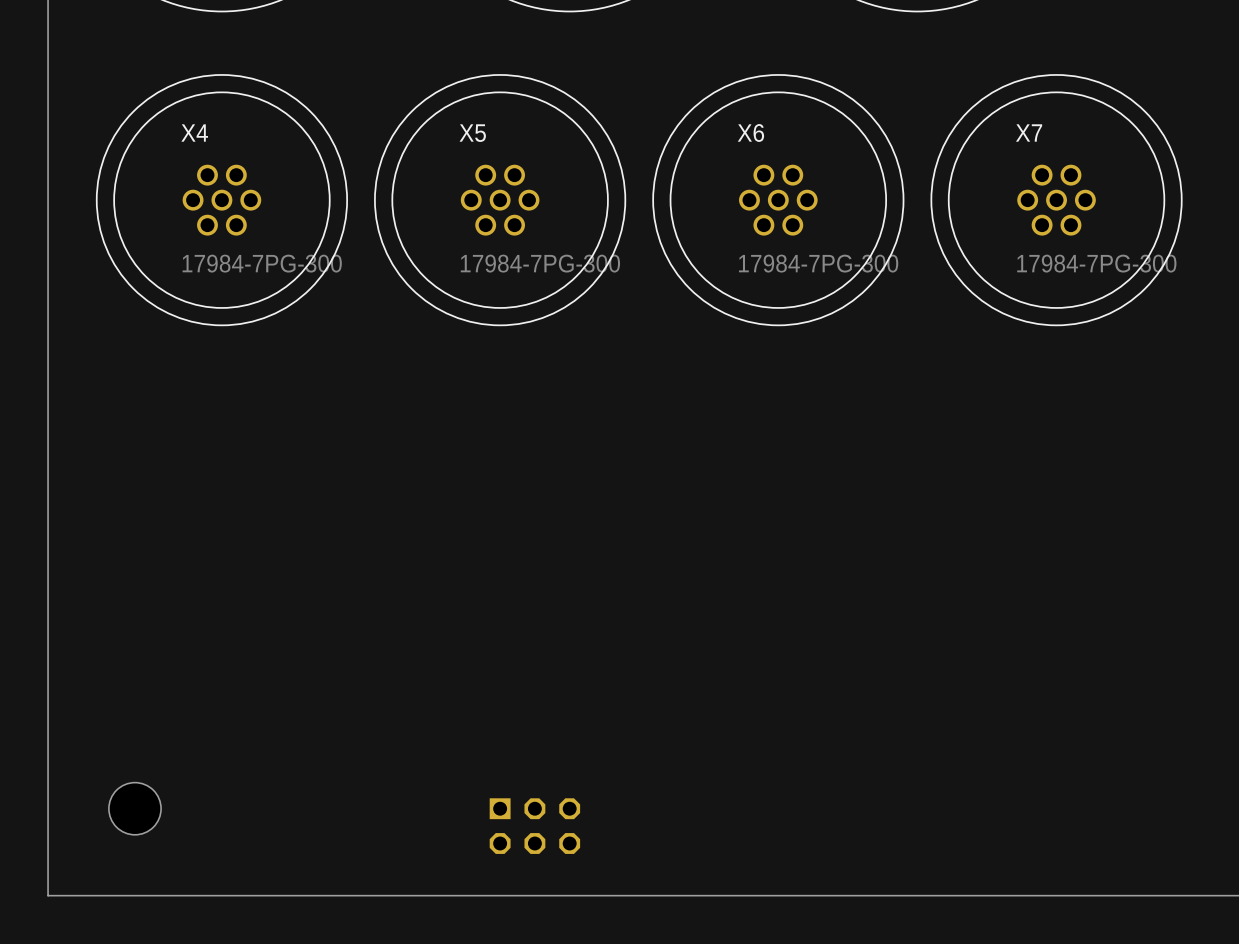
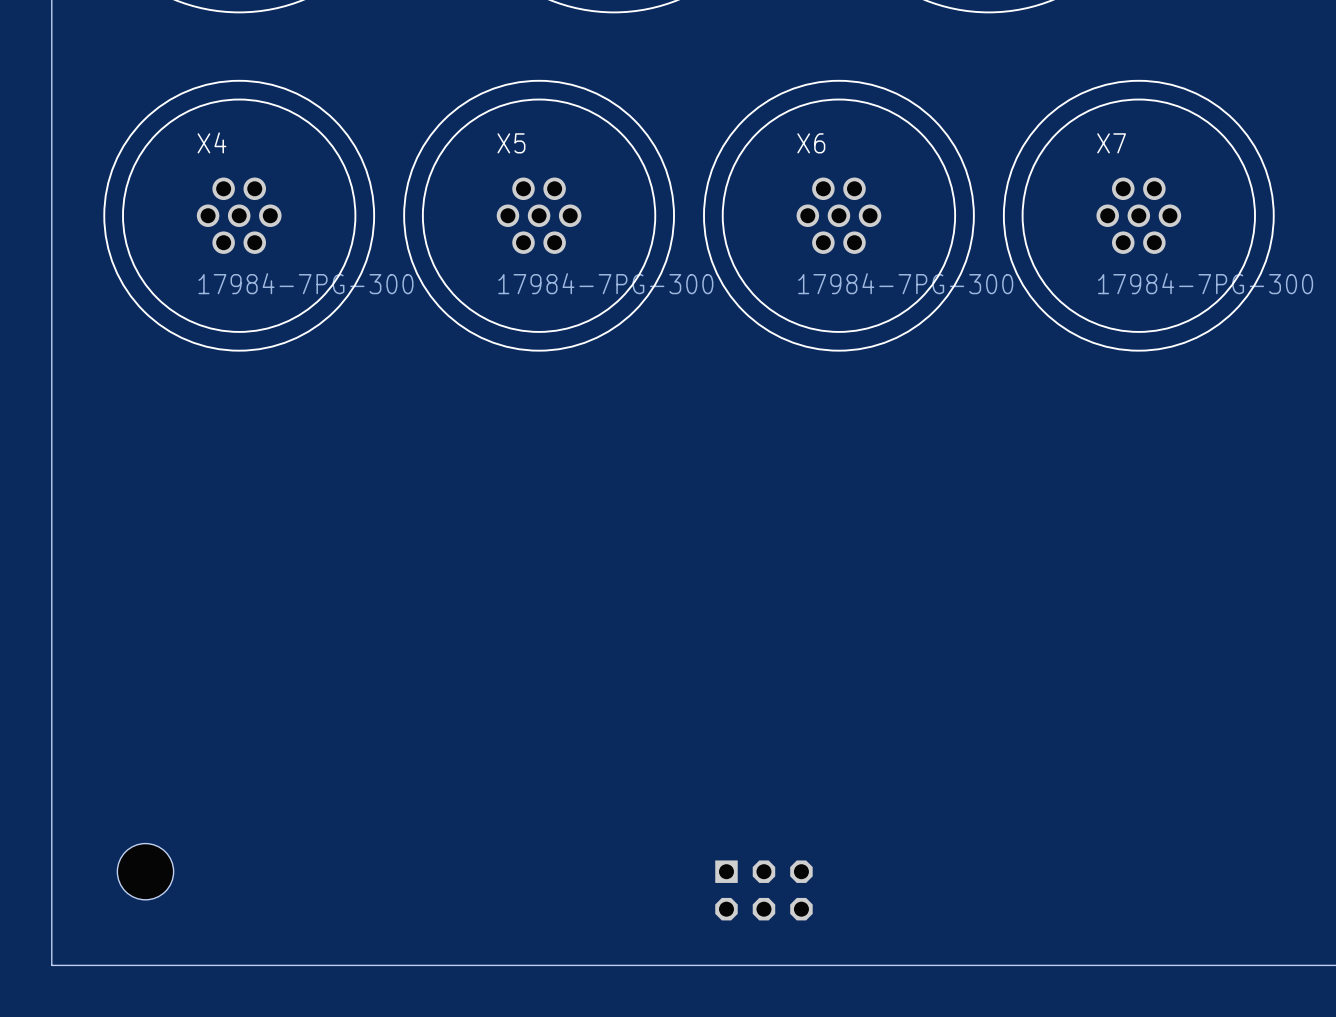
part position: (534, 826) -> (763, 890)

